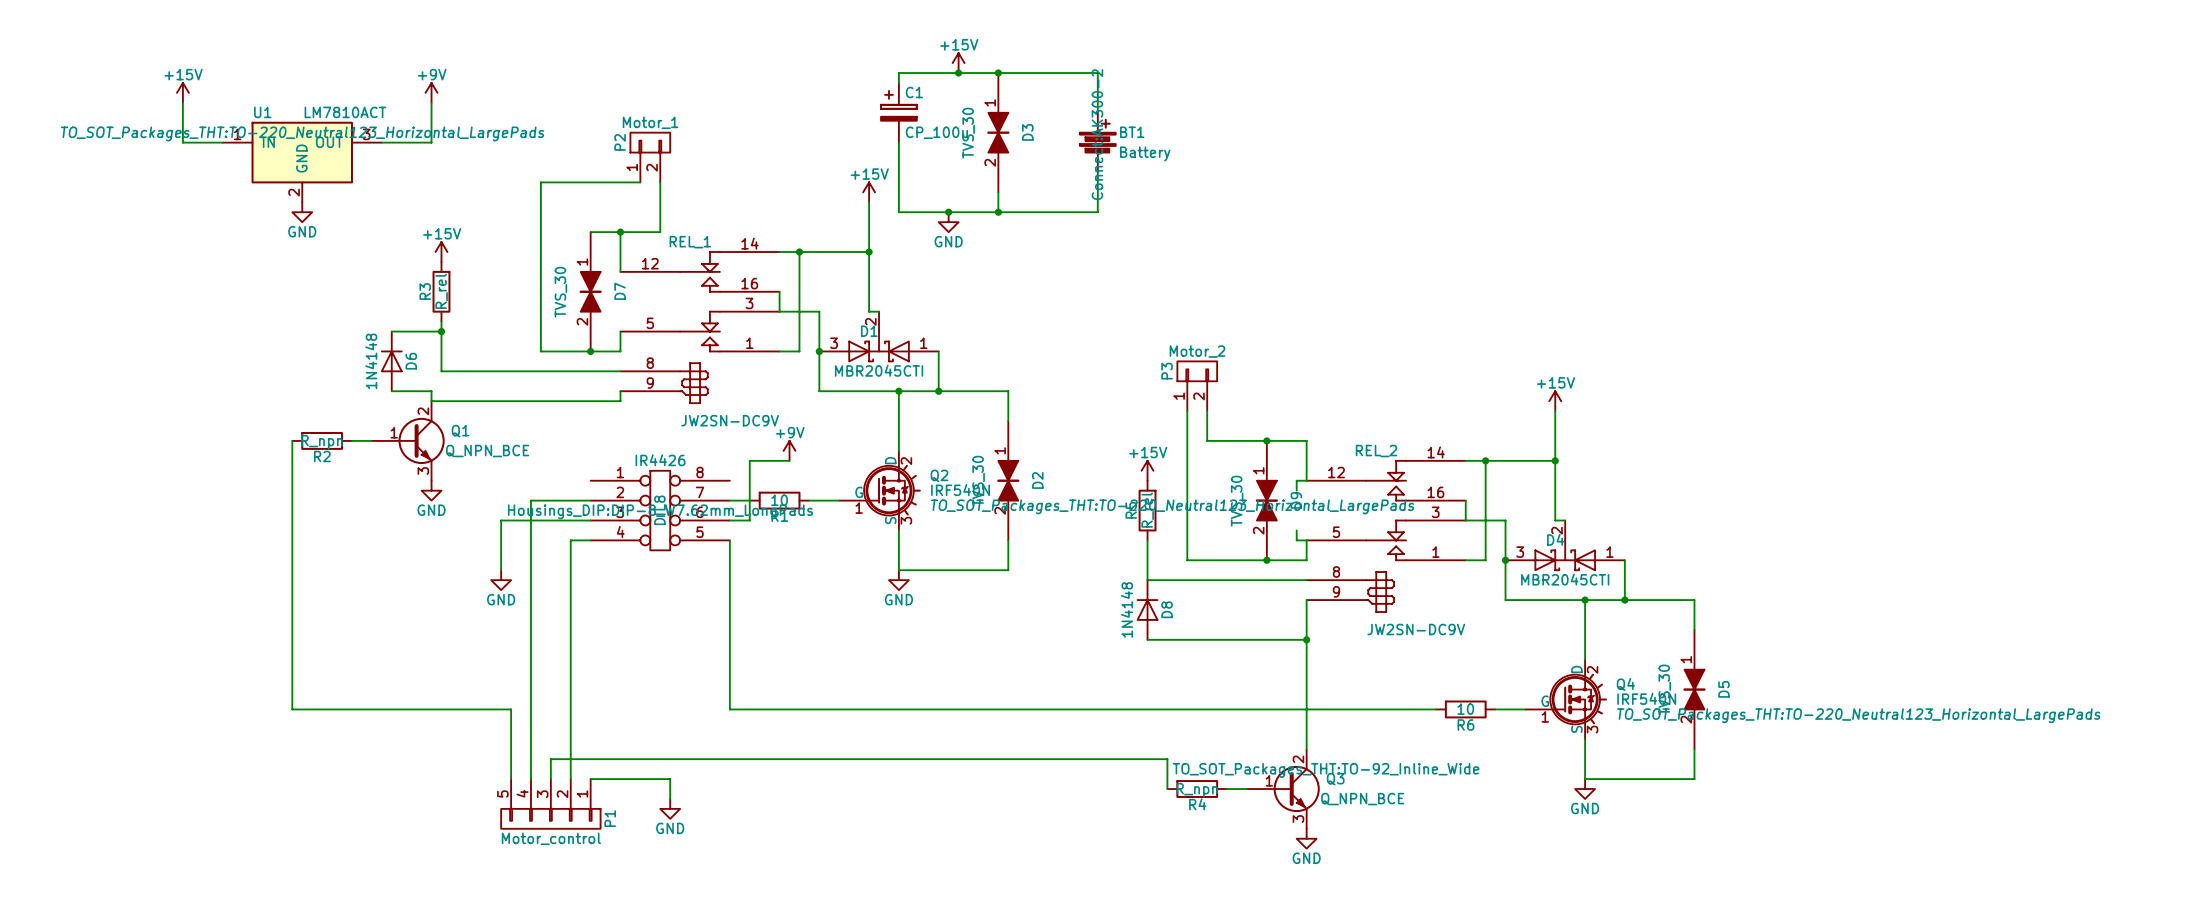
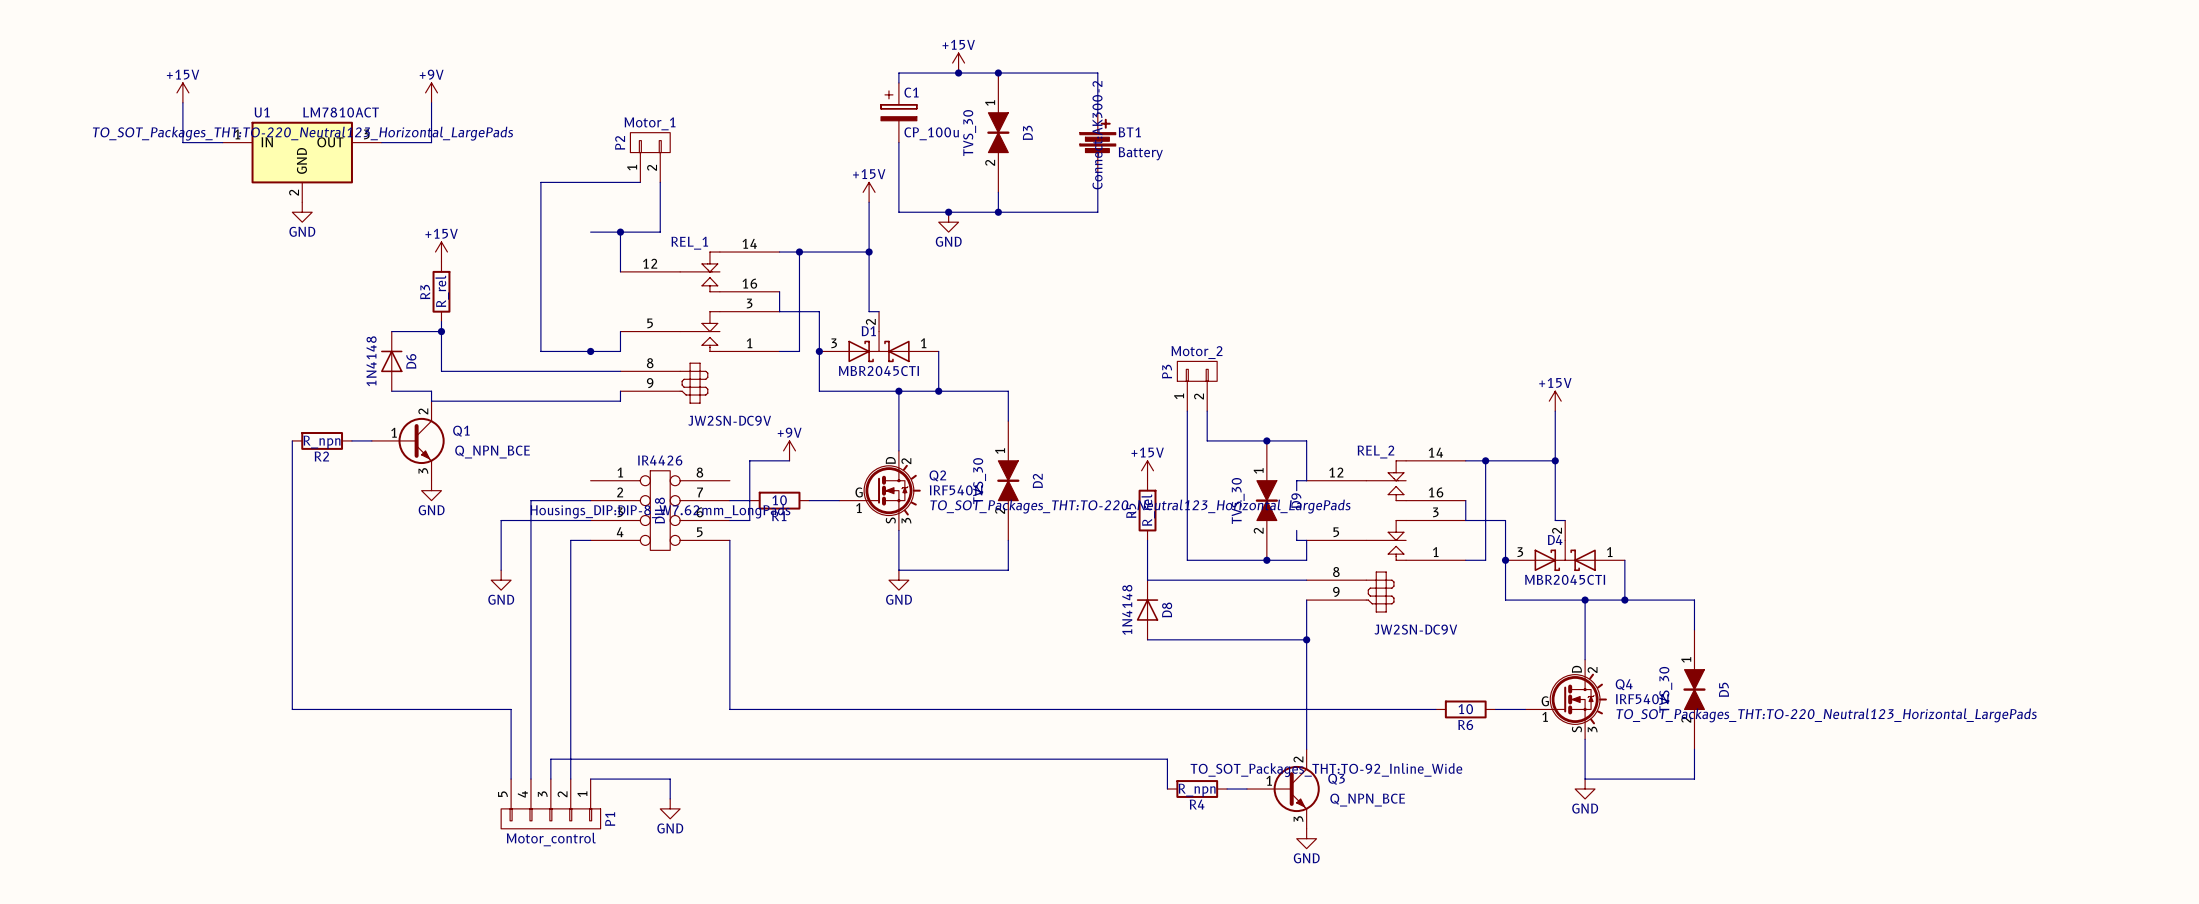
D7: TVS_30 (590, 291) -> none

